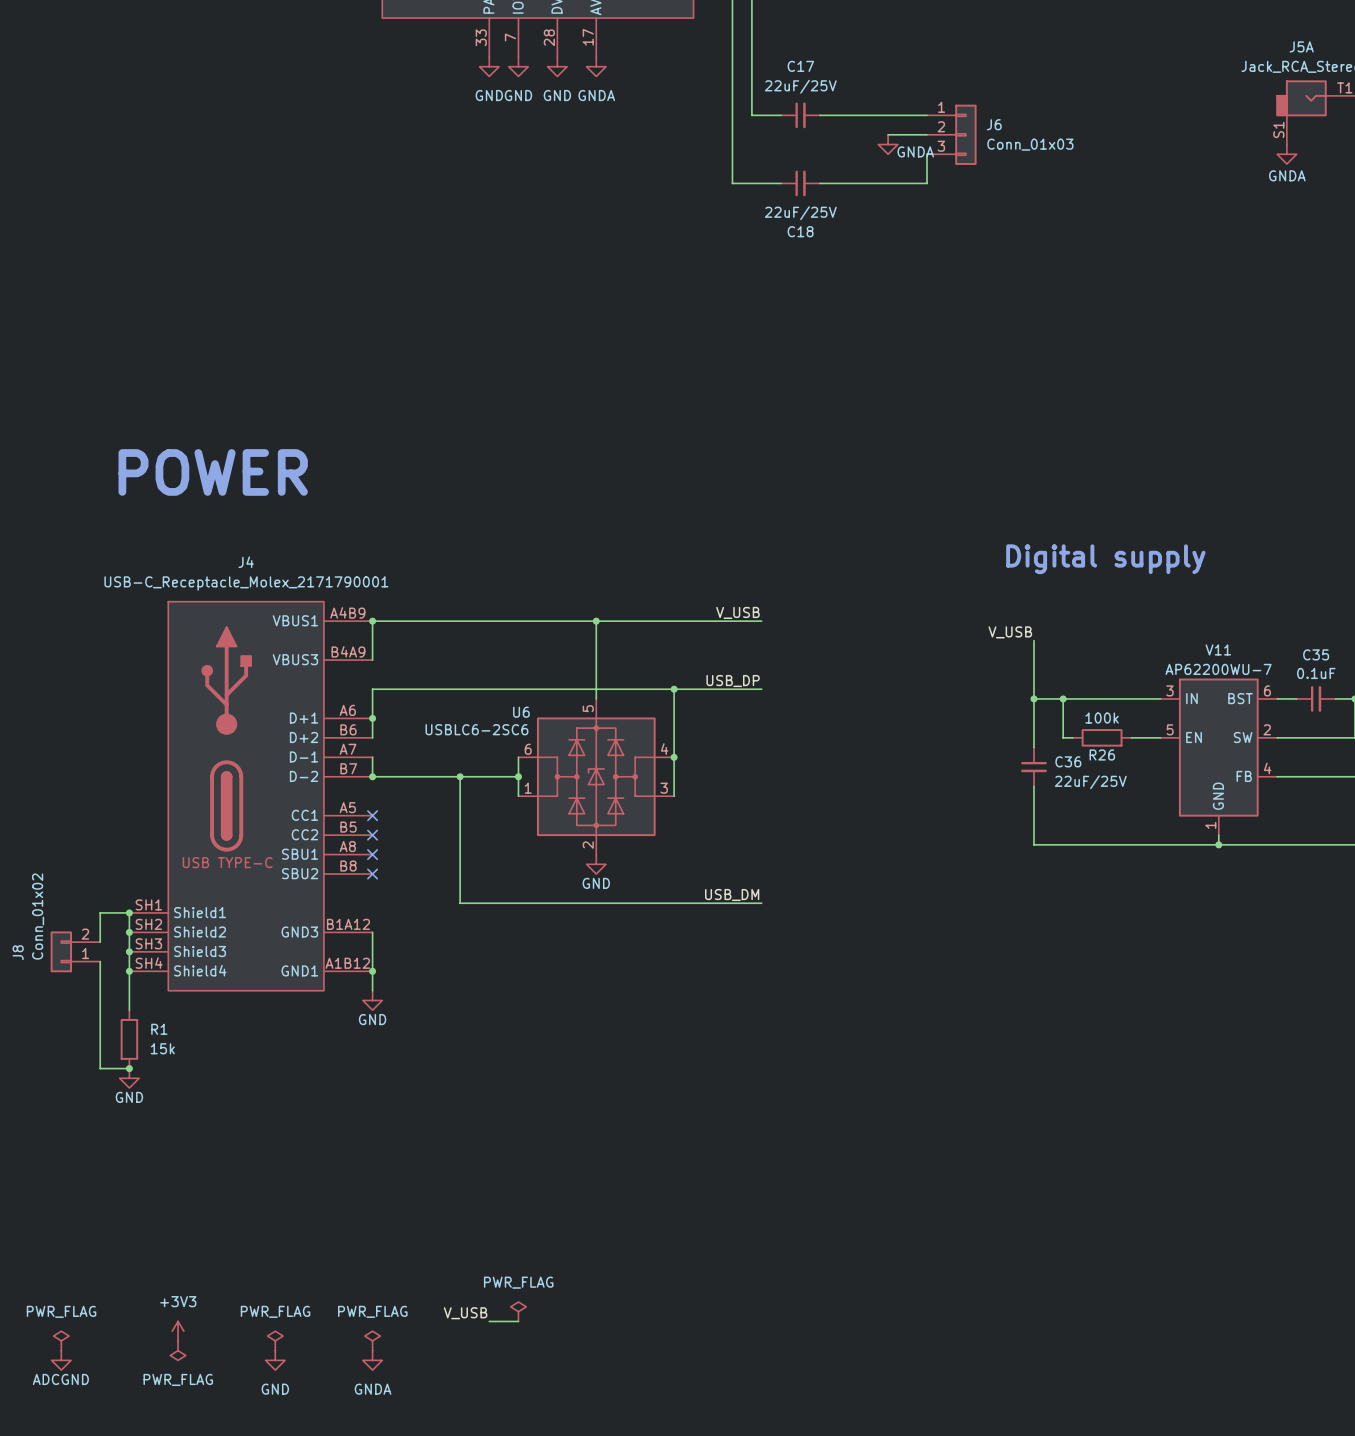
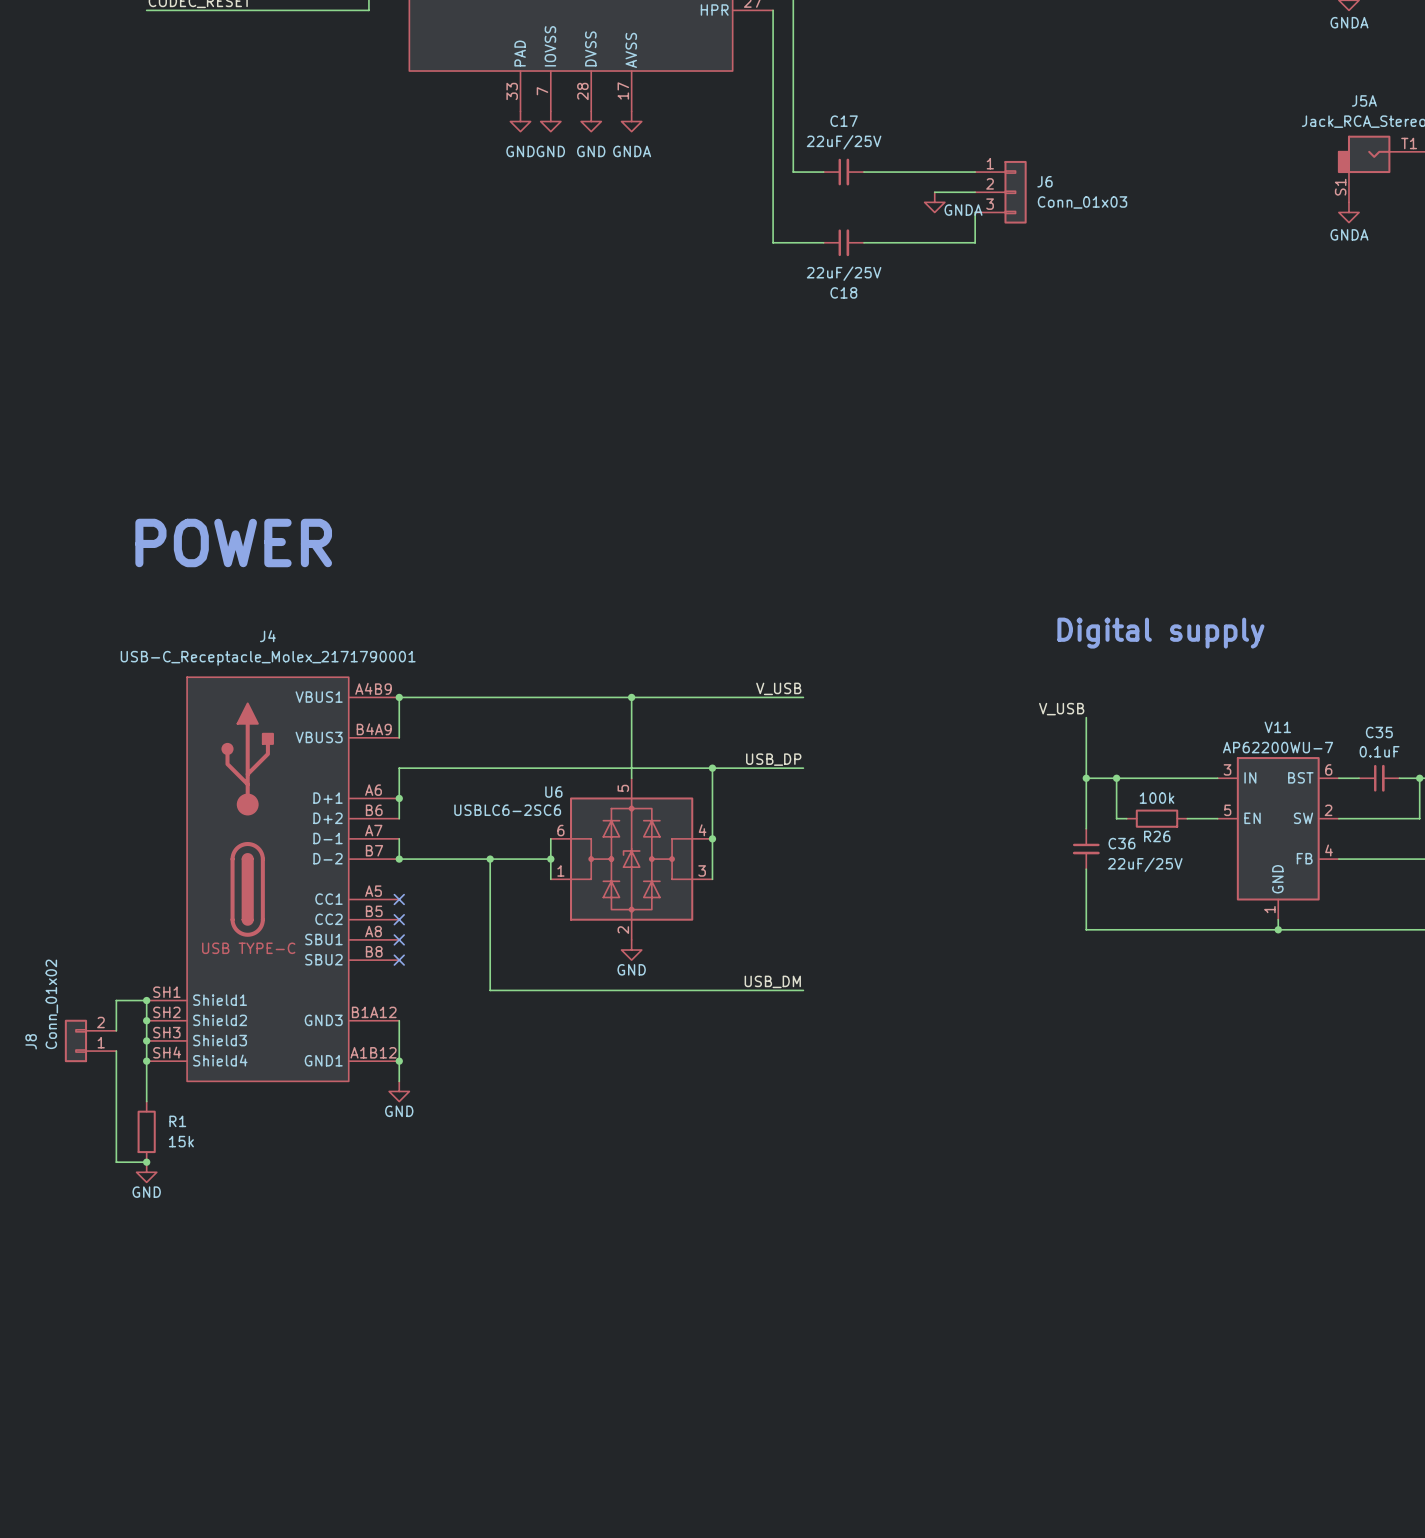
power symbol: PWR_FLAG (518, 1311) -> none
label: V_USB (465, 1313) -> none
wire: (489, 1321) (518, 1321) -> none
power symbol: +3V3 (178, 1331) -> none
power symbol: PWR_FLAG (61, 1340) -> none
power symbol: PWR_FLAG (275, 1340) -> none
power symbol: PWR_FLAG (372, 1340) -> none
power symbol: PWR_FLAG (178, 1350) -> none
power symbol: ADCGND (61, 1360) -> none
power symbol: GND (275, 1360) -> none
power symbol: GNDA (372, 1360) -> none

